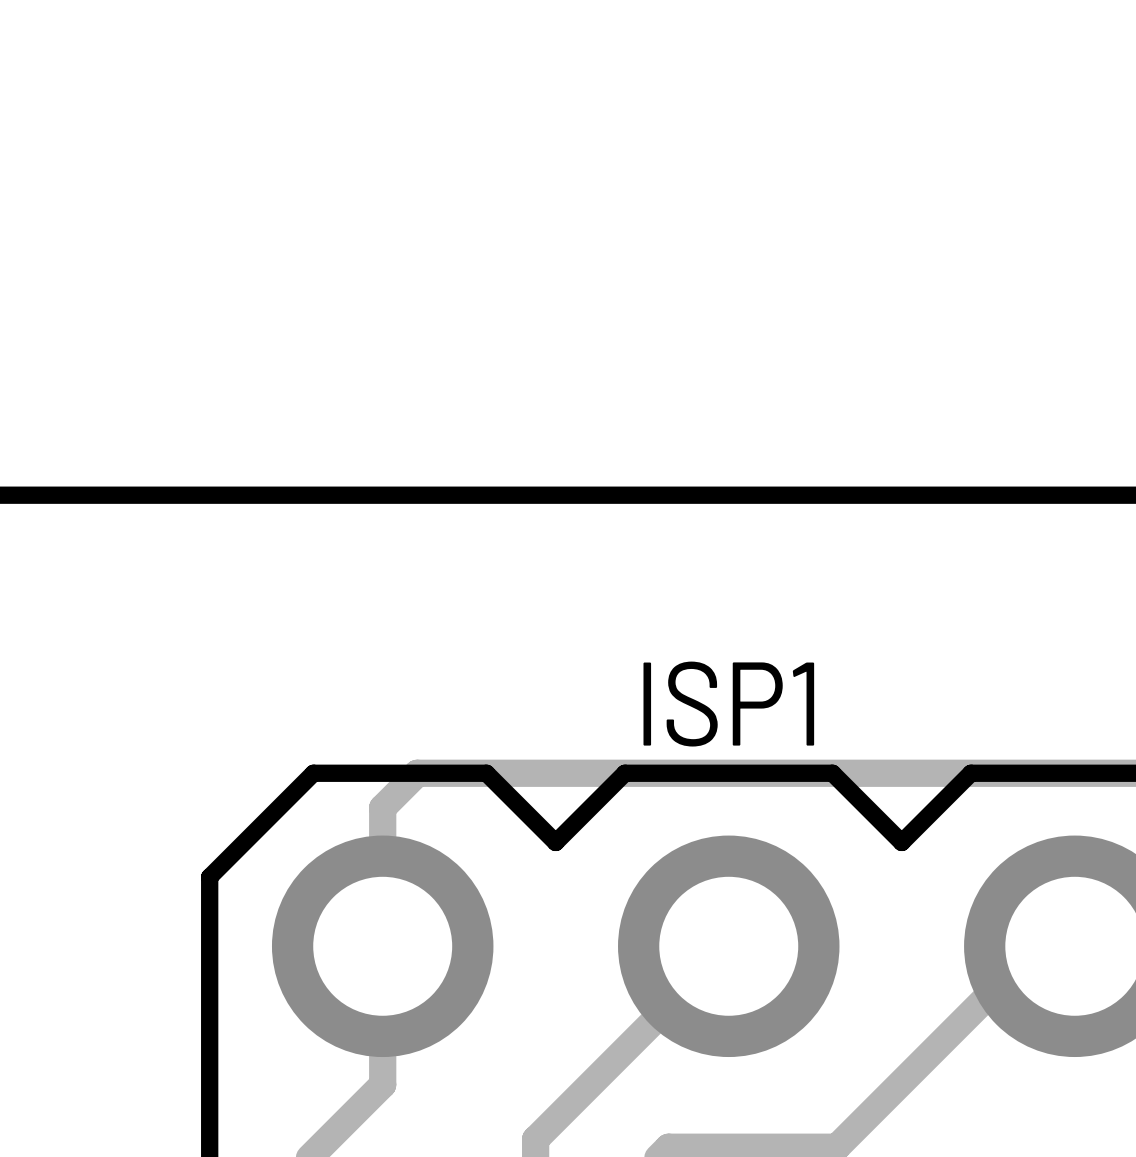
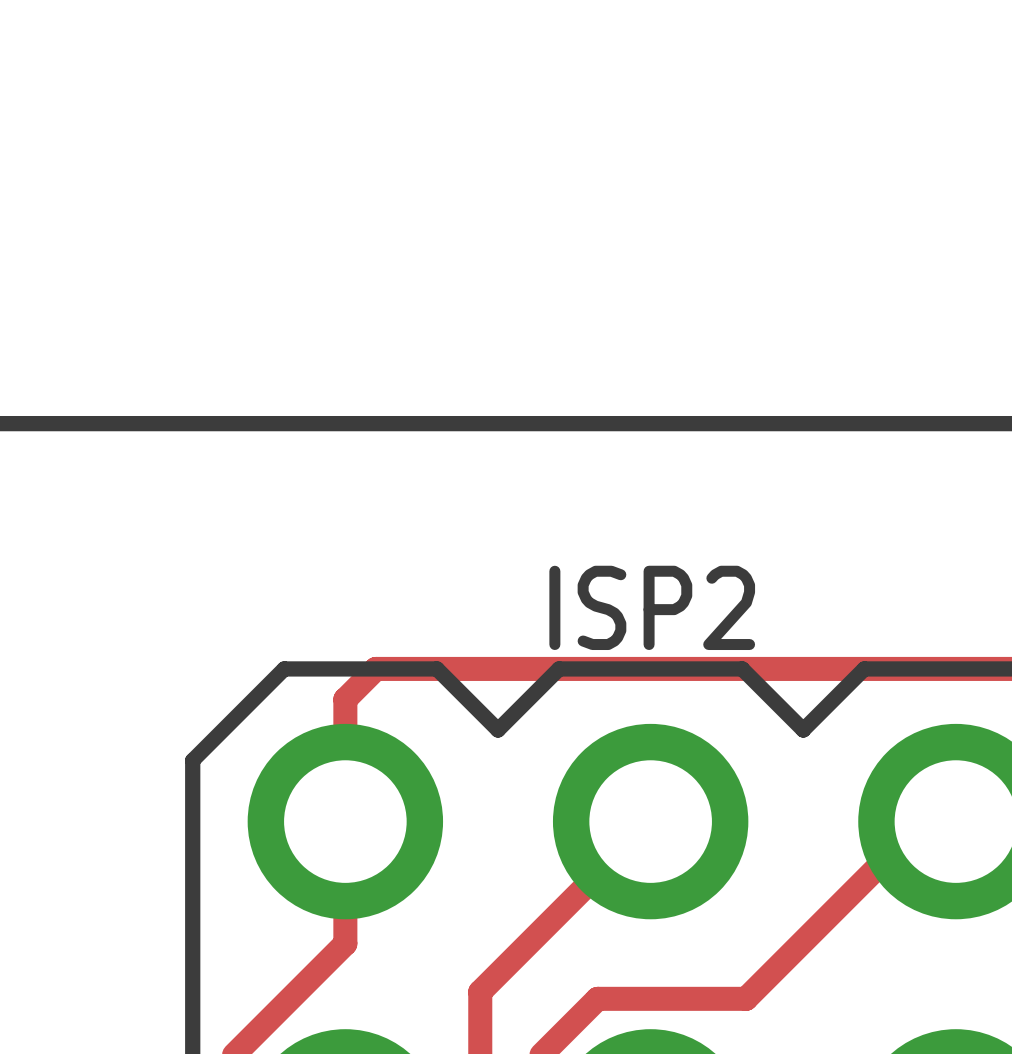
ISP1 name: ISP1 (728, 704) -> ISP2 (652, 607)

